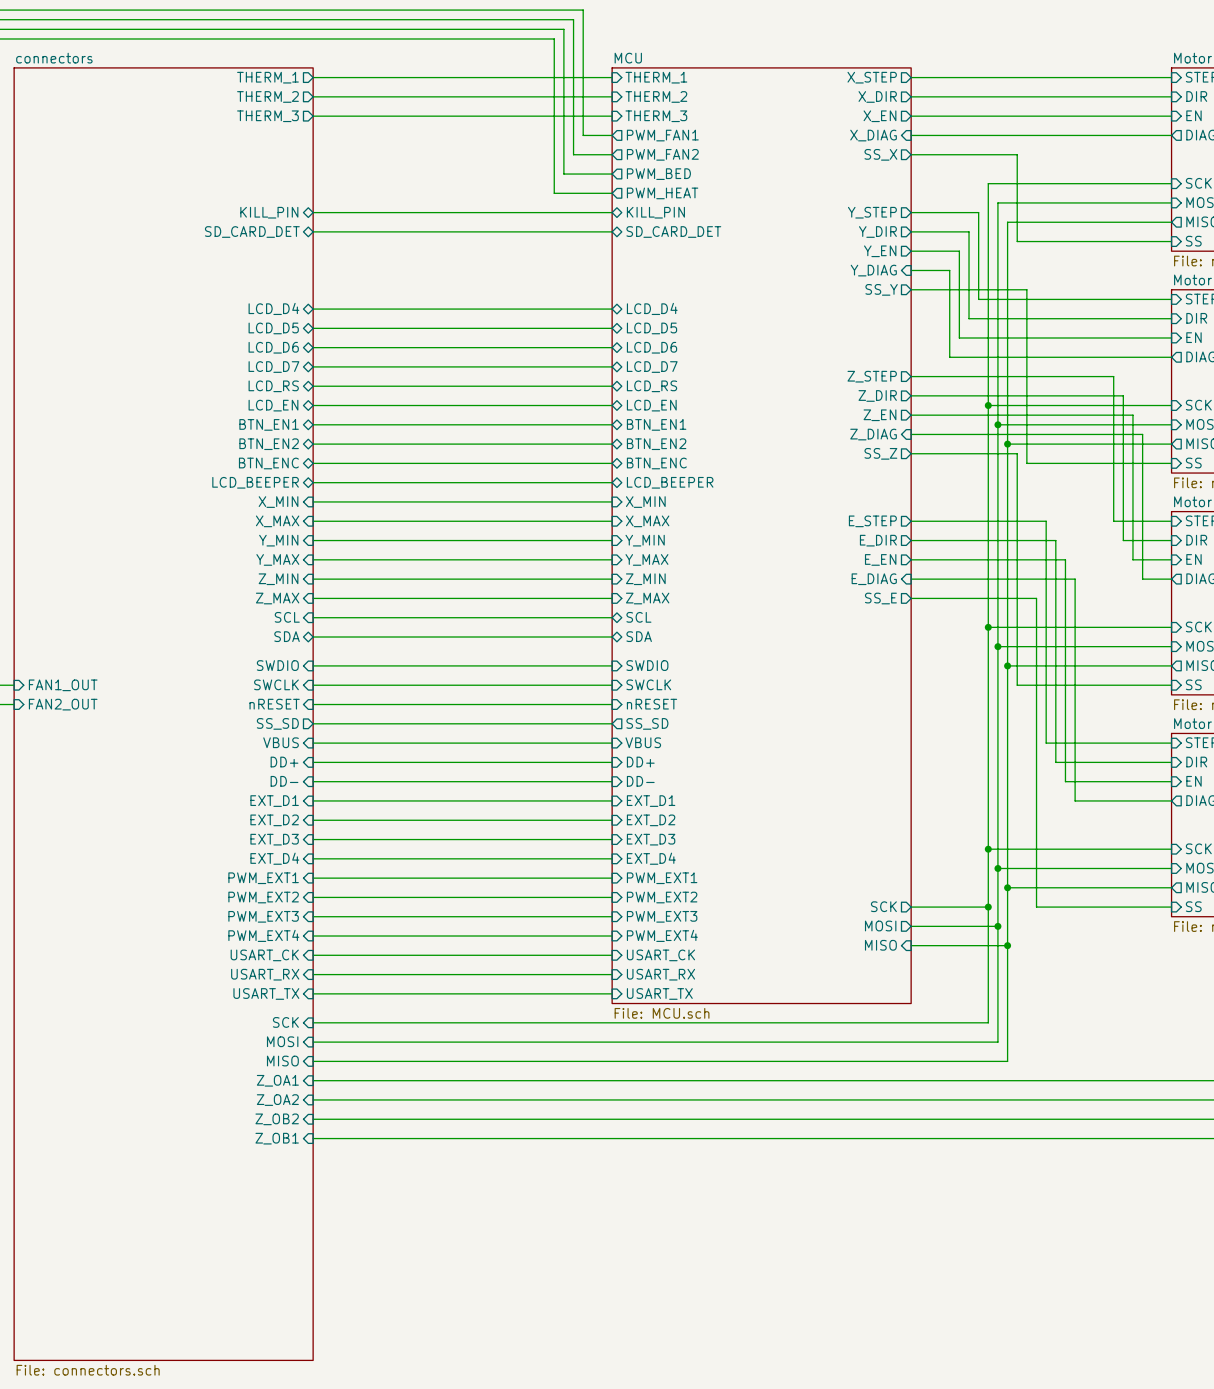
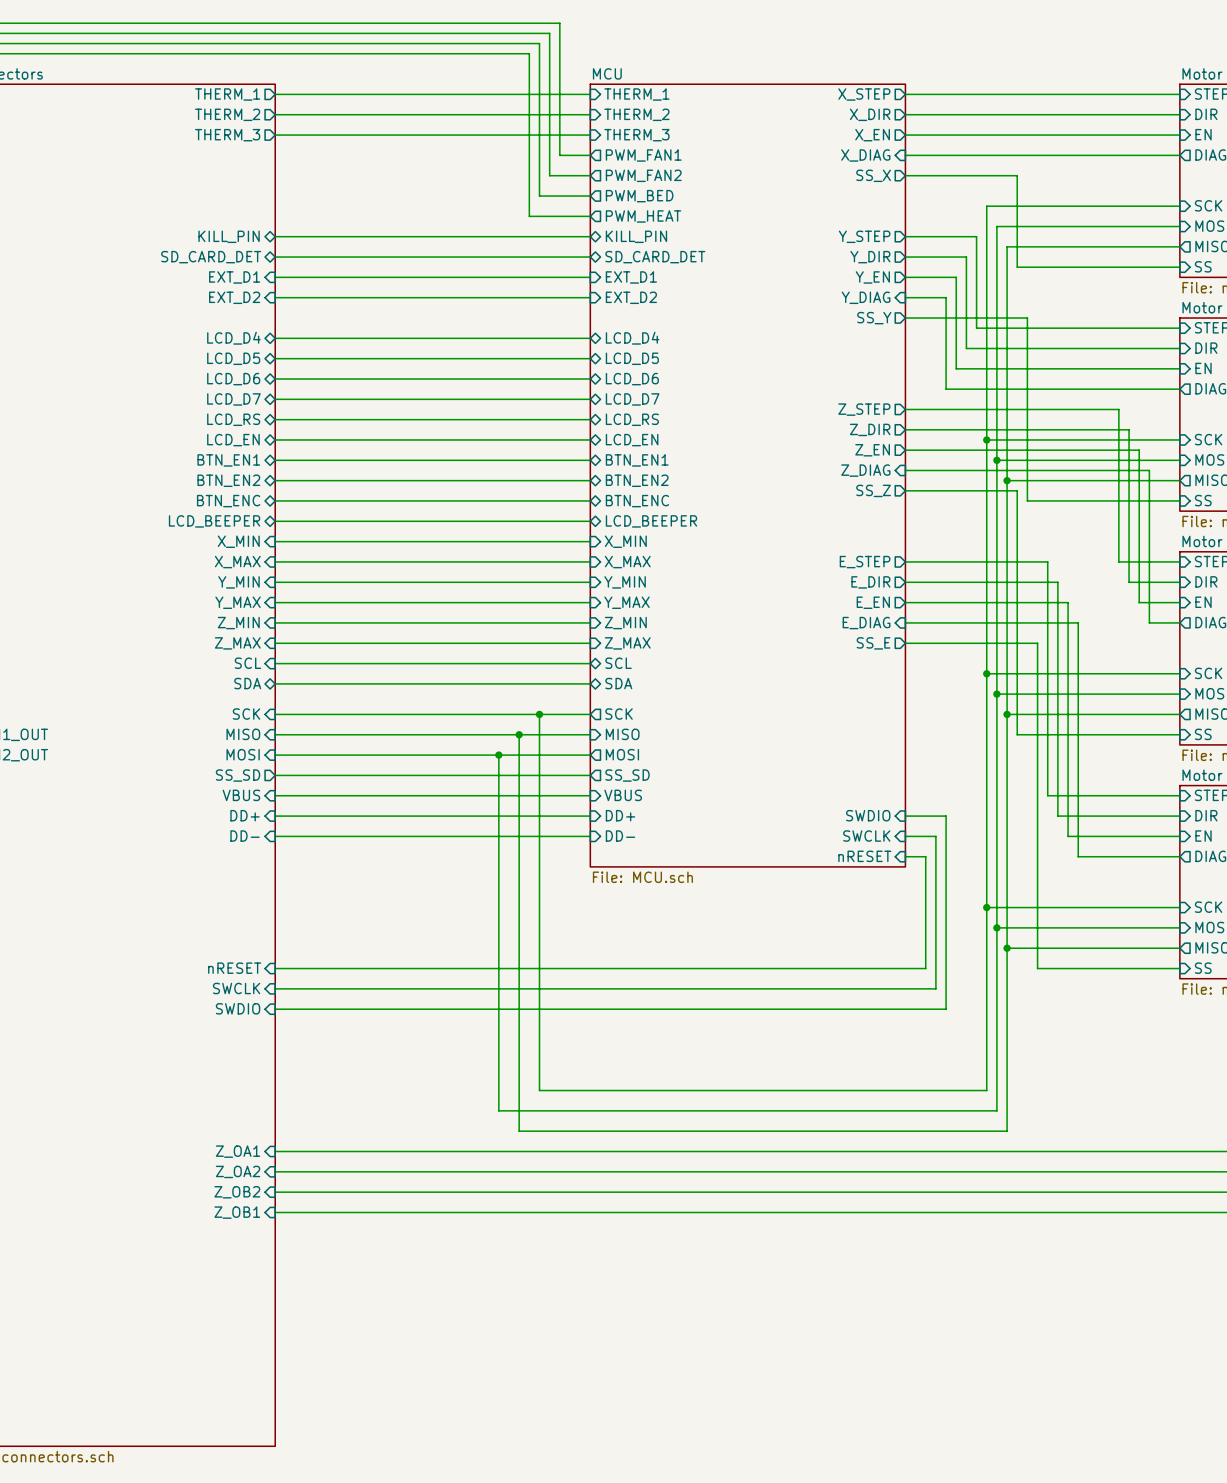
sheet pin: none -> EXT_D1 (234, 277)
wire: none -> (275, 277) (590, 277)
sheet pin: none -> EXT_D1 (631, 277)
sheet pin: none -> EXT_D2 (234, 297)
wire: none -> (275, 297) (590, 297)
sheet pin: none -> EXT_D2 (631, 297)
sheet MCU: none -> File: MCU.sch (747, 475)
sheet MCU: File: MCU.sch (761, 535) -> none
sheet pin: SWDIO (277, 665) -> SCK (246, 714)
junction: none -> (539, 714)
sheet pin shape: input (647, 665) -> output (619, 714)
sheet pin: SWDIO (647, 665) -> SCK (619, 714)
sheet pin: SWCLK (276, 684) -> MISO (243, 734)
sheet pin: SWCLK (648, 684) -> MISO (622, 734)
junction: none -> (519, 734)
sheet pin: nRESET (274, 704) -> MOSI (243, 754)
junction: none -> (498, 755)
sheet pin shape: input (652, 704) -> output (622, 754)
sheet pin: nRESET (652, 704) -> MOSI (622, 754)
sheet pin: none -> SWDIO (868, 815)
sheet pin: none -> SWCLK (866, 836)
wire: (313, 800) (612, 800) -> none
sheet pin: none -> nRESET (864, 856)
sheet pin: EXT_D1 (274, 801) -> none
sheet pin: EXT_D1 (651, 801) -> none
sheet pin: EXT_D2 (274, 820) -> none
wire: (313, 820) (612, 820) -> none
sheet pin: EXT_D2 (651, 820) -> none
sheet pin: EXT_D3 (274, 839) -> none
wire: (313, 839) (612, 839) -> none
sheet pin: EXT_D3 (651, 839) -> none
sheet pin: EXT_D4 (274, 858) -> none
wire: (313, 858) (612, 858) -> none
sheet pin: EXT_D4 (651, 858) -> none
sheet pin: PWM_EXT1 (263, 878) -> none
wire: (313, 878) (612, 878) -> none
sheet pin: PWM_EXT1 (662, 878) -> none
sheet pin: PWM_EXT2 (263, 897) -> none
wire: (313, 897) (612, 897) -> none
sheet pin: PWM_EXT2 (662, 897) -> none
sheet pin: none -> nRESET (234, 968)
sheet pin: SCK (883, 906) -> none
wire: none -> (275, 968) (905, 968)
wire: (930, 907) (988, 907) -> (925, 968) (925, 856) (905, 856)
junction: (988, 907) -> none
sheet pin: PWM_EXT3 (263, 916) -> none
wire: (313, 916) (612, 916) -> none
sheet pin: PWM_EXT3 (662, 916) -> none
sheet pin: none -> SWCLK (236, 988)
sheet pin: MOSI (880, 925) -> none
wire: none -> (275, 988) (905, 988)
wire: (940, 926) (997, 926) -> (935, 988) (935, 836) (905, 836)
junction: (997, 926) -> none
sheet pin: PWM_EXT4 (263, 935) -> none
sheet pin: PWM_EXT4 (662, 935) -> none
wire: (313, 936) (612, 936) -> none
sheet pin: none -> SWDIO (238, 1008)
wire: none -> (275, 1009) (905, 1009)
sheet pin: MISO (880, 945) -> none
wire: (949, 945) (1007, 945) -> (946, 1009) (946, 816) (905, 816)
junction: (1007, 945) -> none
sheet pin: USART_CK (264, 955) -> none
wire: (313, 955) (612, 955) -> none
sheet pin: USART_CK (660, 955) -> none
sheet pin: USART_RX (265, 974) -> none
wire: (313, 974) (612, 974) -> none
sheet pin: USART_RX (660, 974) -> none
sheet pin: USART_TX (266, 993) -> none
wire: (313, 993) (612, 993) -> none
sheet pin: USART_TX (659, 993) -> none
sheet pin: SCK (285, 1022) -> none
wire: (313, 1022) (563, 1022) -> (539, 714) (539, 1090)
sheet pin: MOSI (282, 1041) -> none
wire: (313, 1042) (525, 1042) -> (498, 755) (498, 1110)
sheet pin: MISO (282, 1061) -> none
wire: (313, 1061) (544, 1061) -> (519, 734) (519, 1131)

